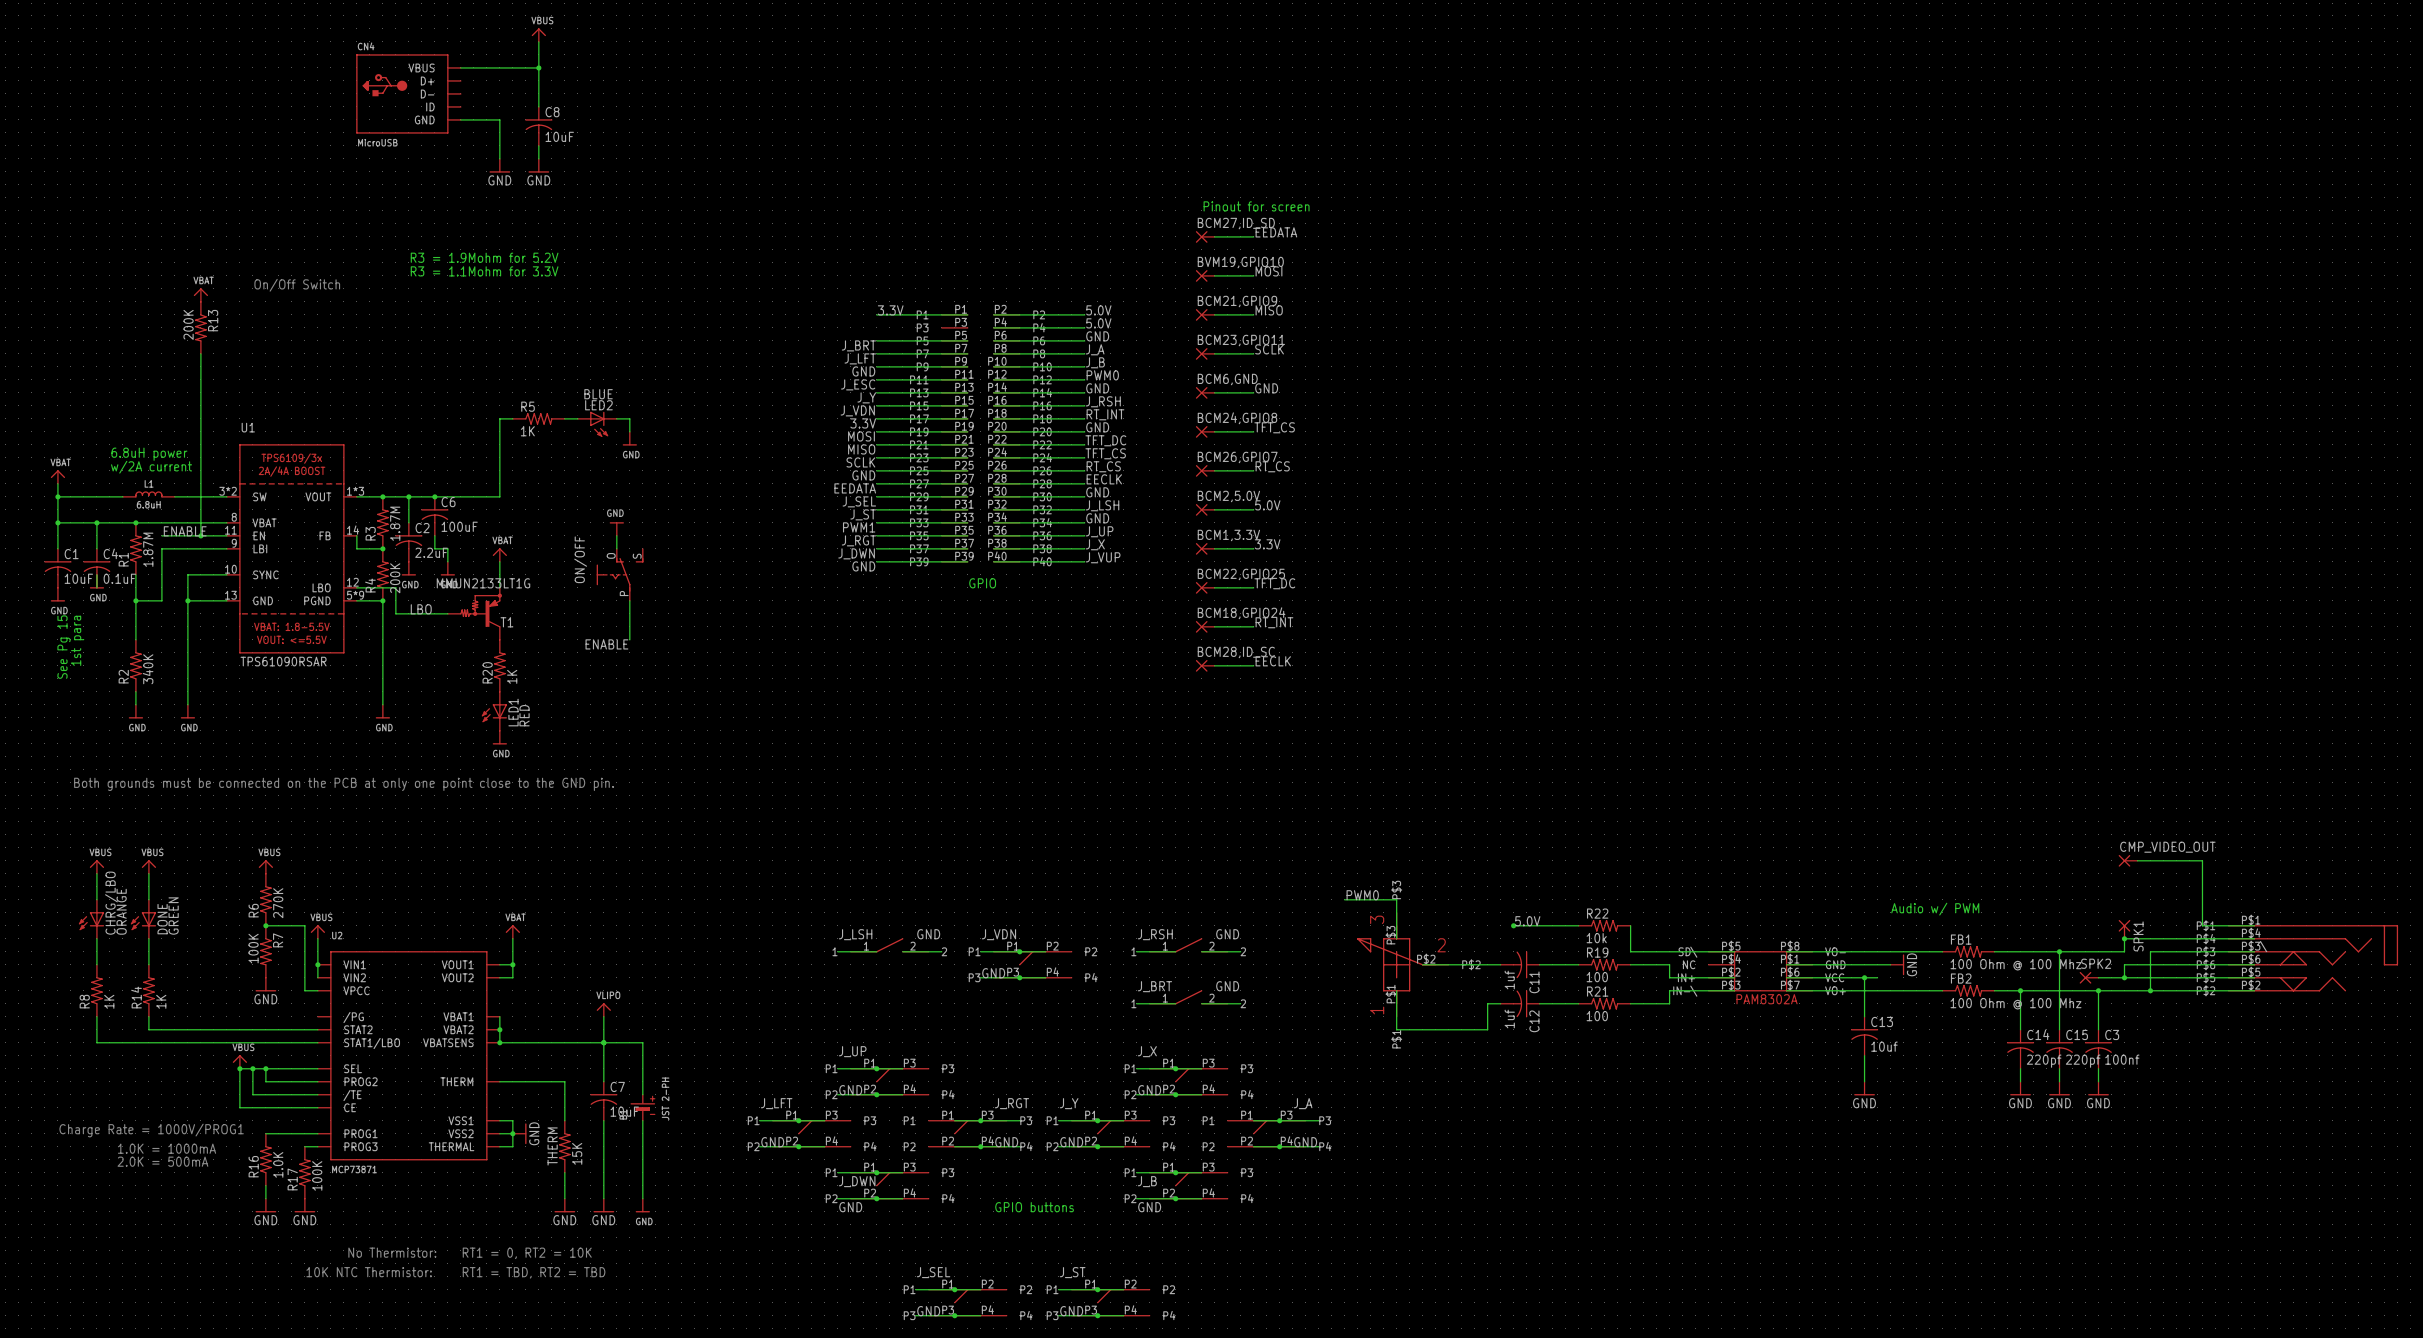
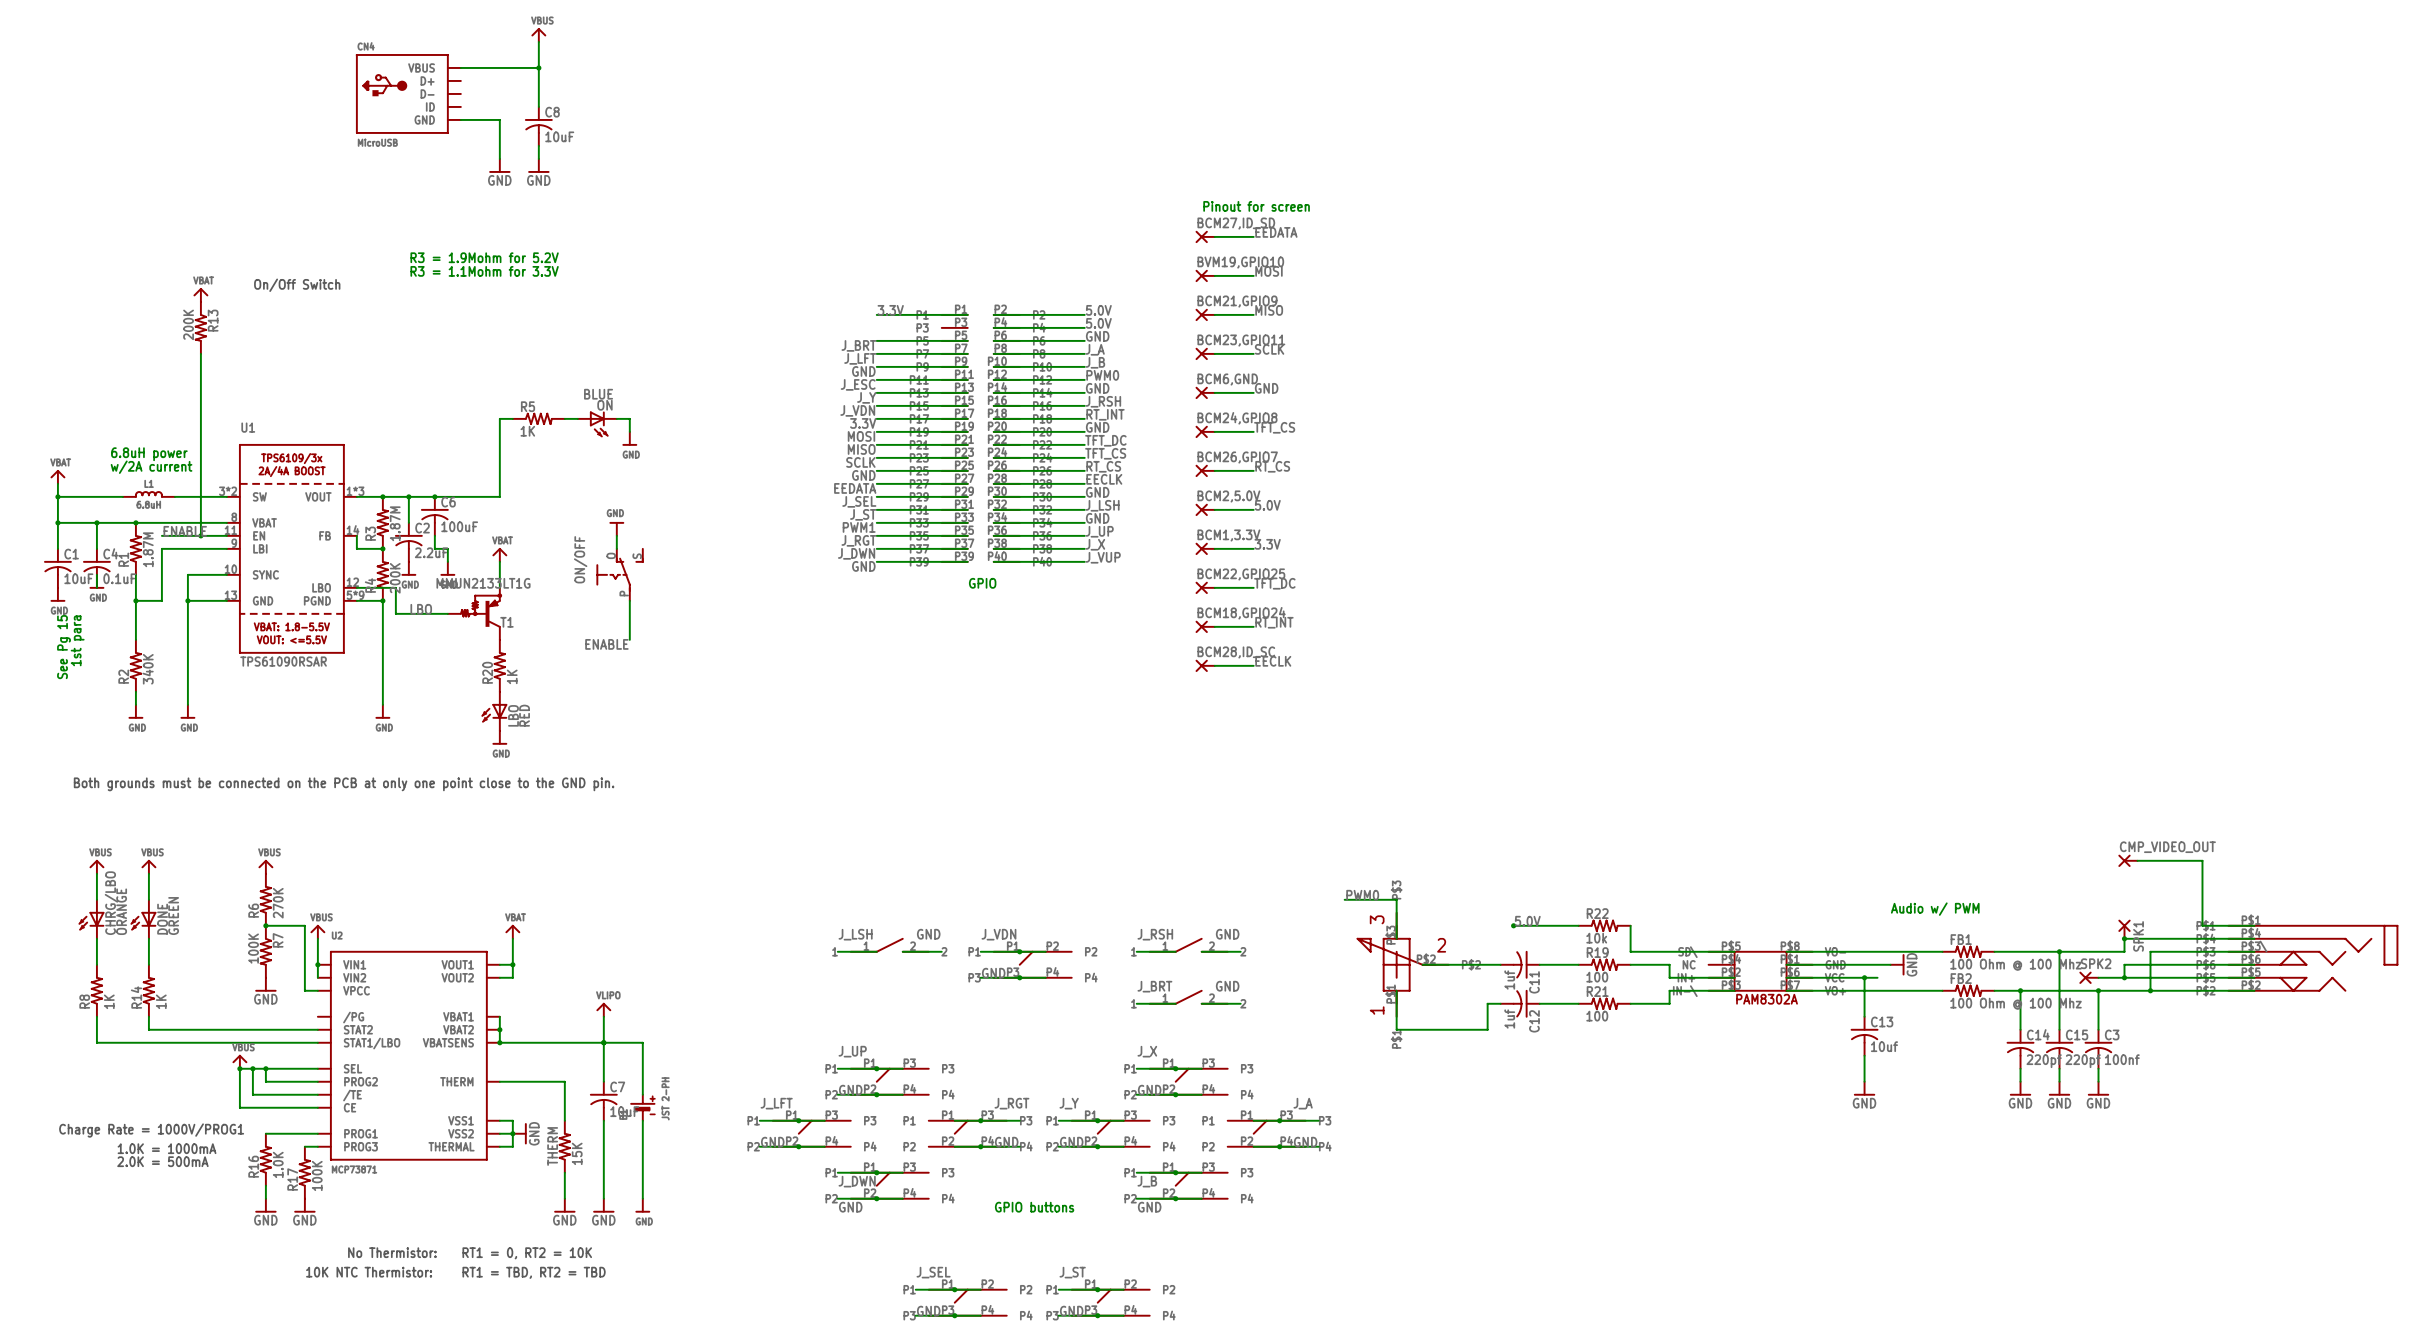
LED2 name: LED2 (598, 405) -> ON (604, 405)
LED1 name: LED1 (513, 712) -> LBO (513, 715)

